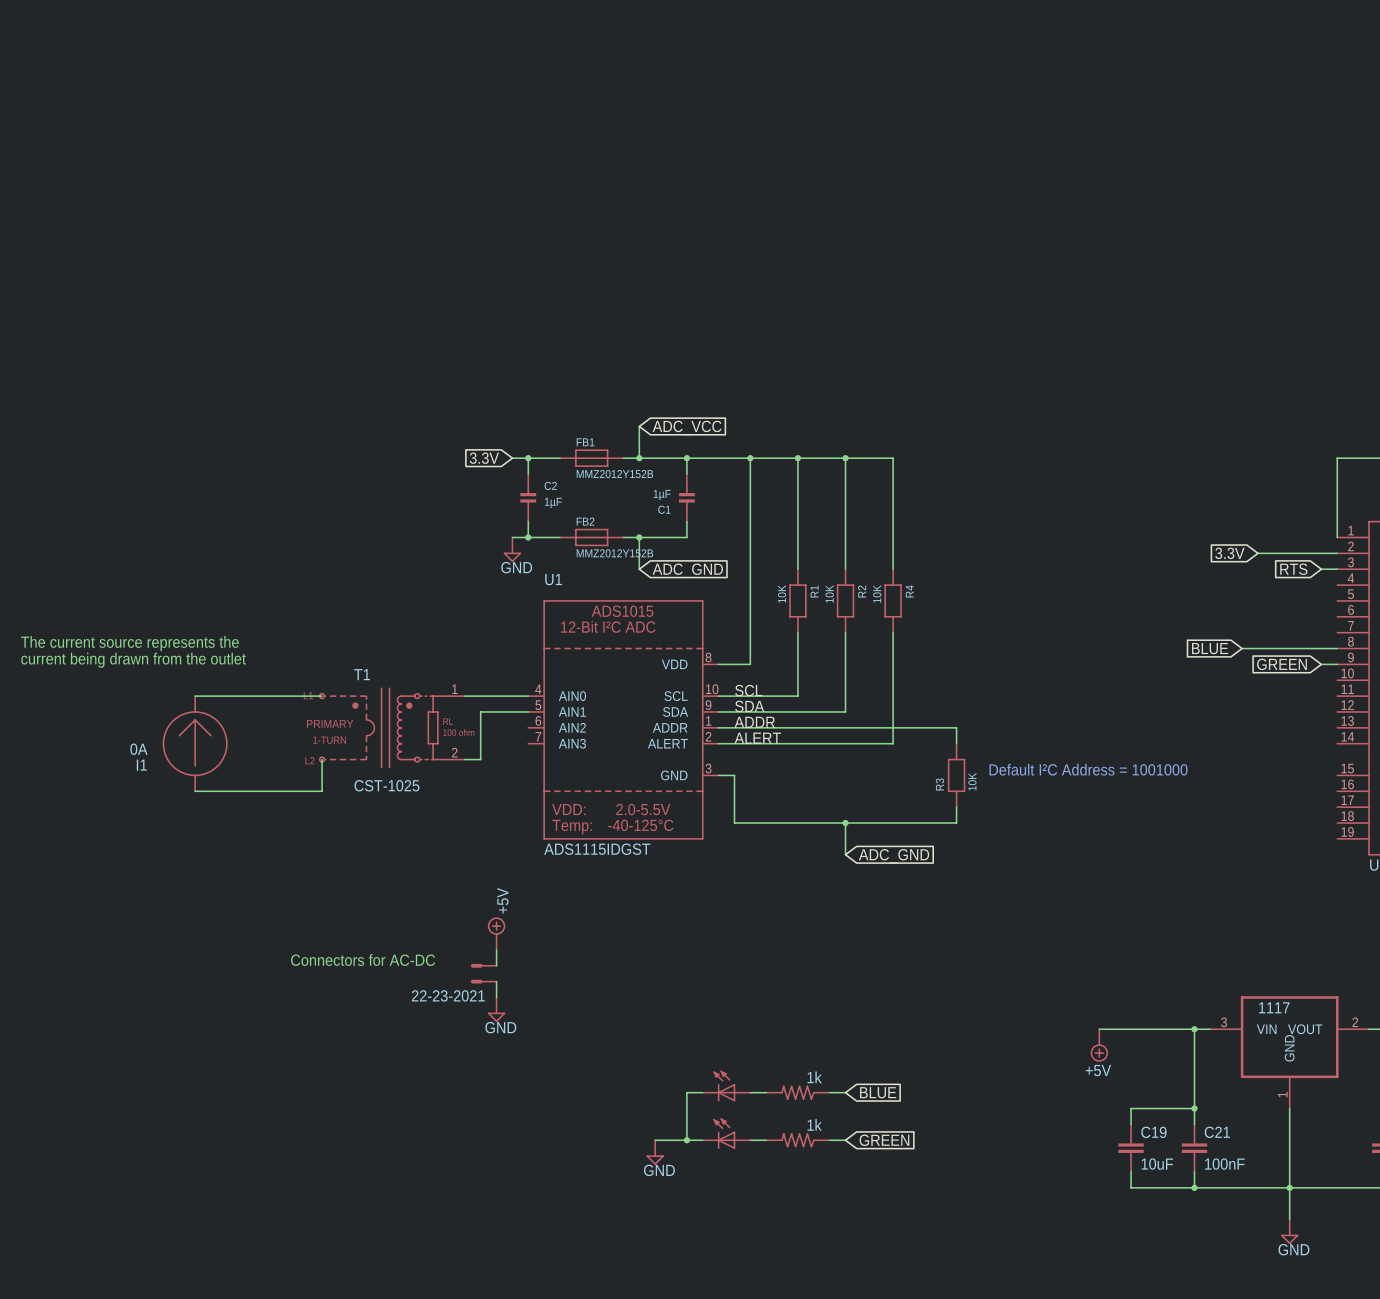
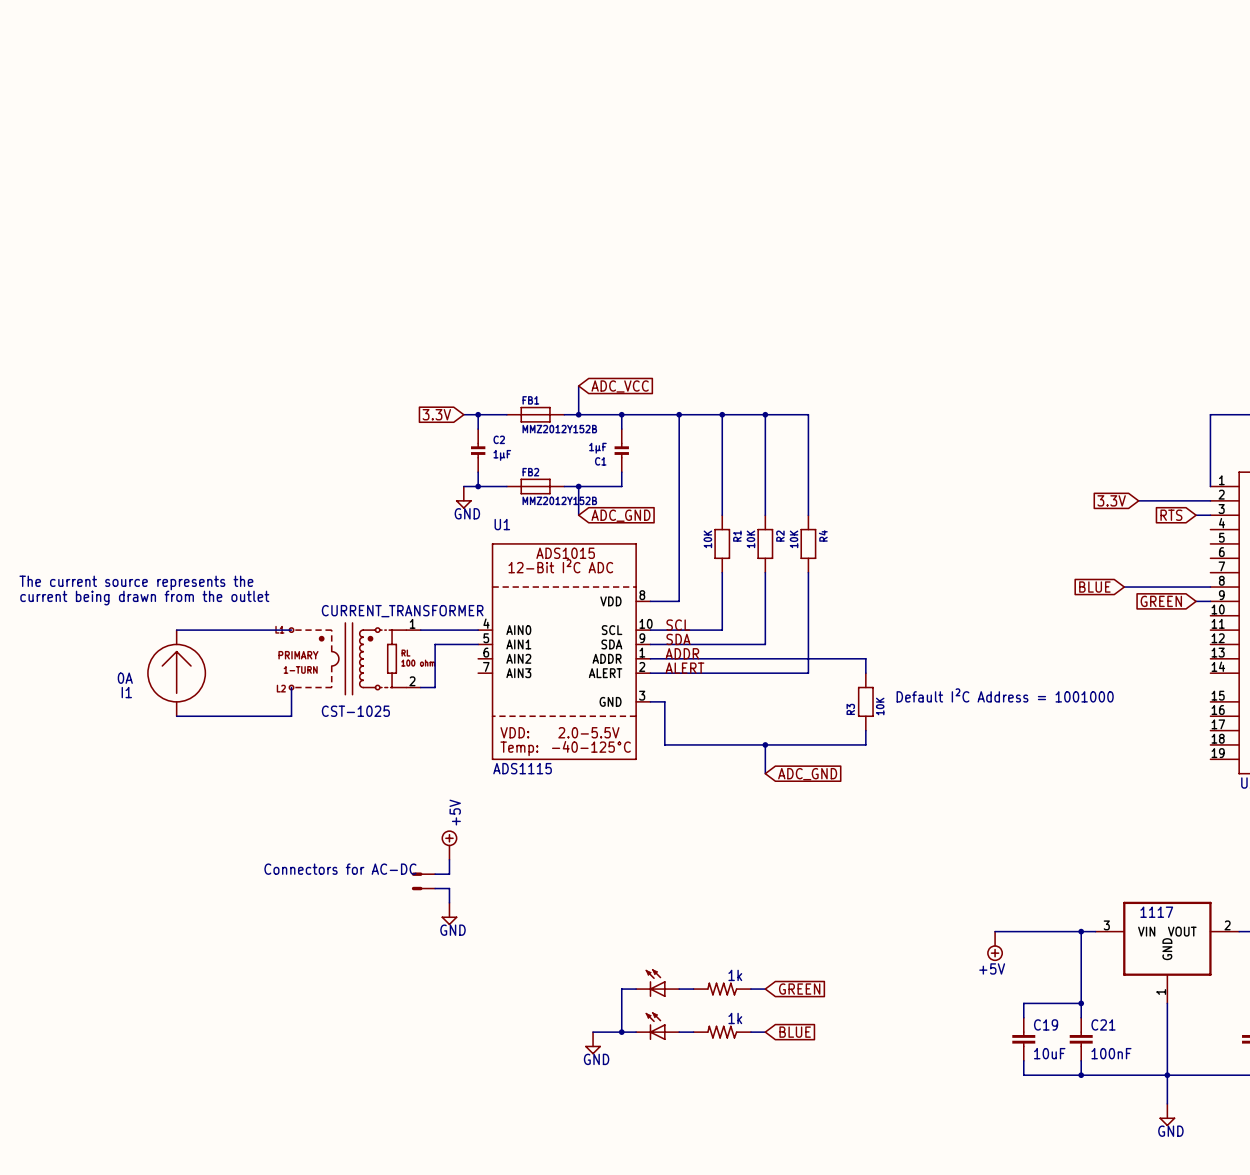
T1 name: T1 (362, 674) -> CURRENT_TRANSFORMER (402, 611)
U1 value: ADS1115IDGST (597, 849) -> ADS1115 (522, 768)
part: none -> (423, 874)
part: (483, 965) -> none
part: none -> (423, 888)
part: 22-23-2021 (483, 981) -> none
global label: BLUE (878, 1092) -> GREEN (799, 989)
global label: GREEN (884, 1140) -> BLUE (795, 1032)

